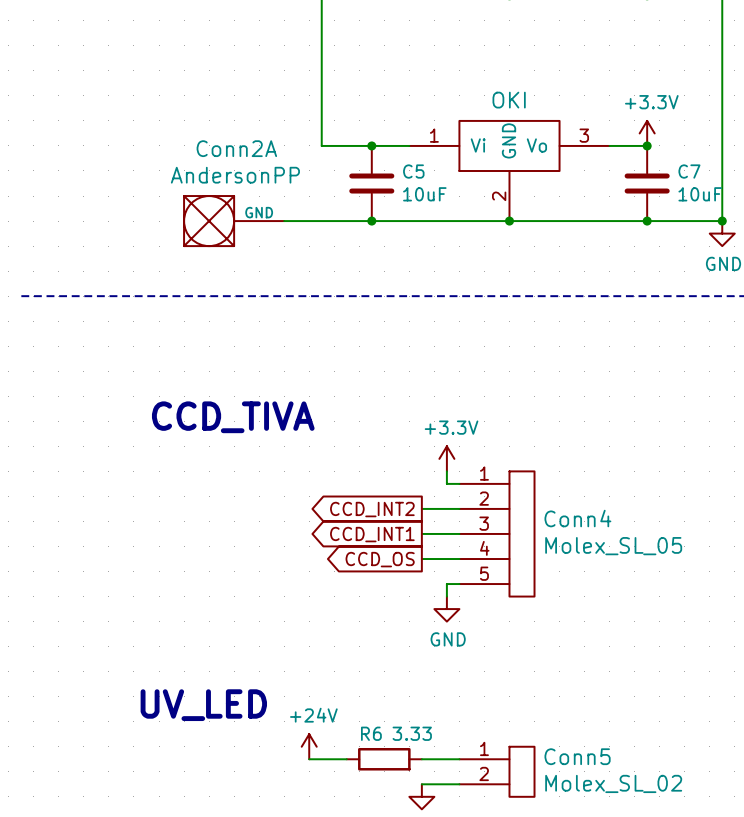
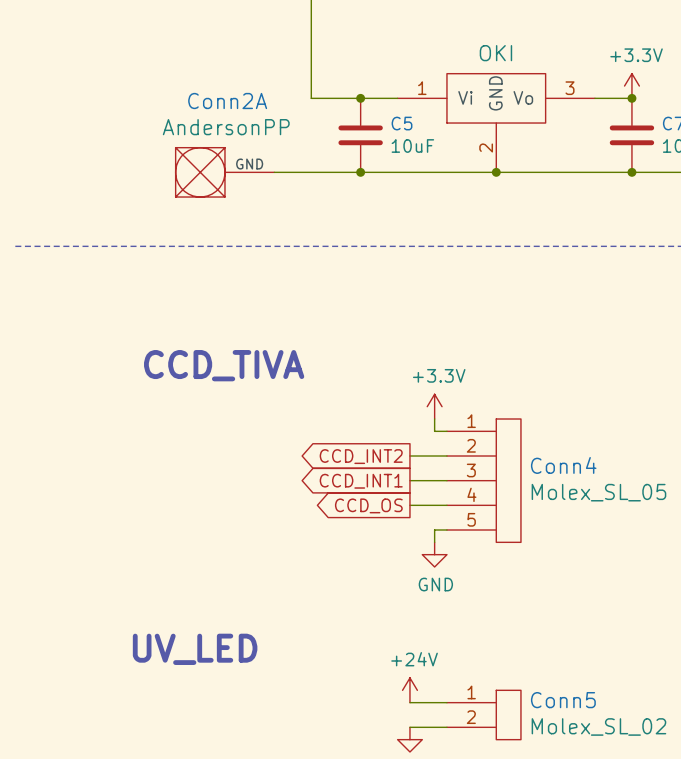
power symbol position: +24V (309, 746) -> +24V (409, 690)
wire: (309, 759) (346, 759) -> none
R6: 3.33 (384, 759) -> none

